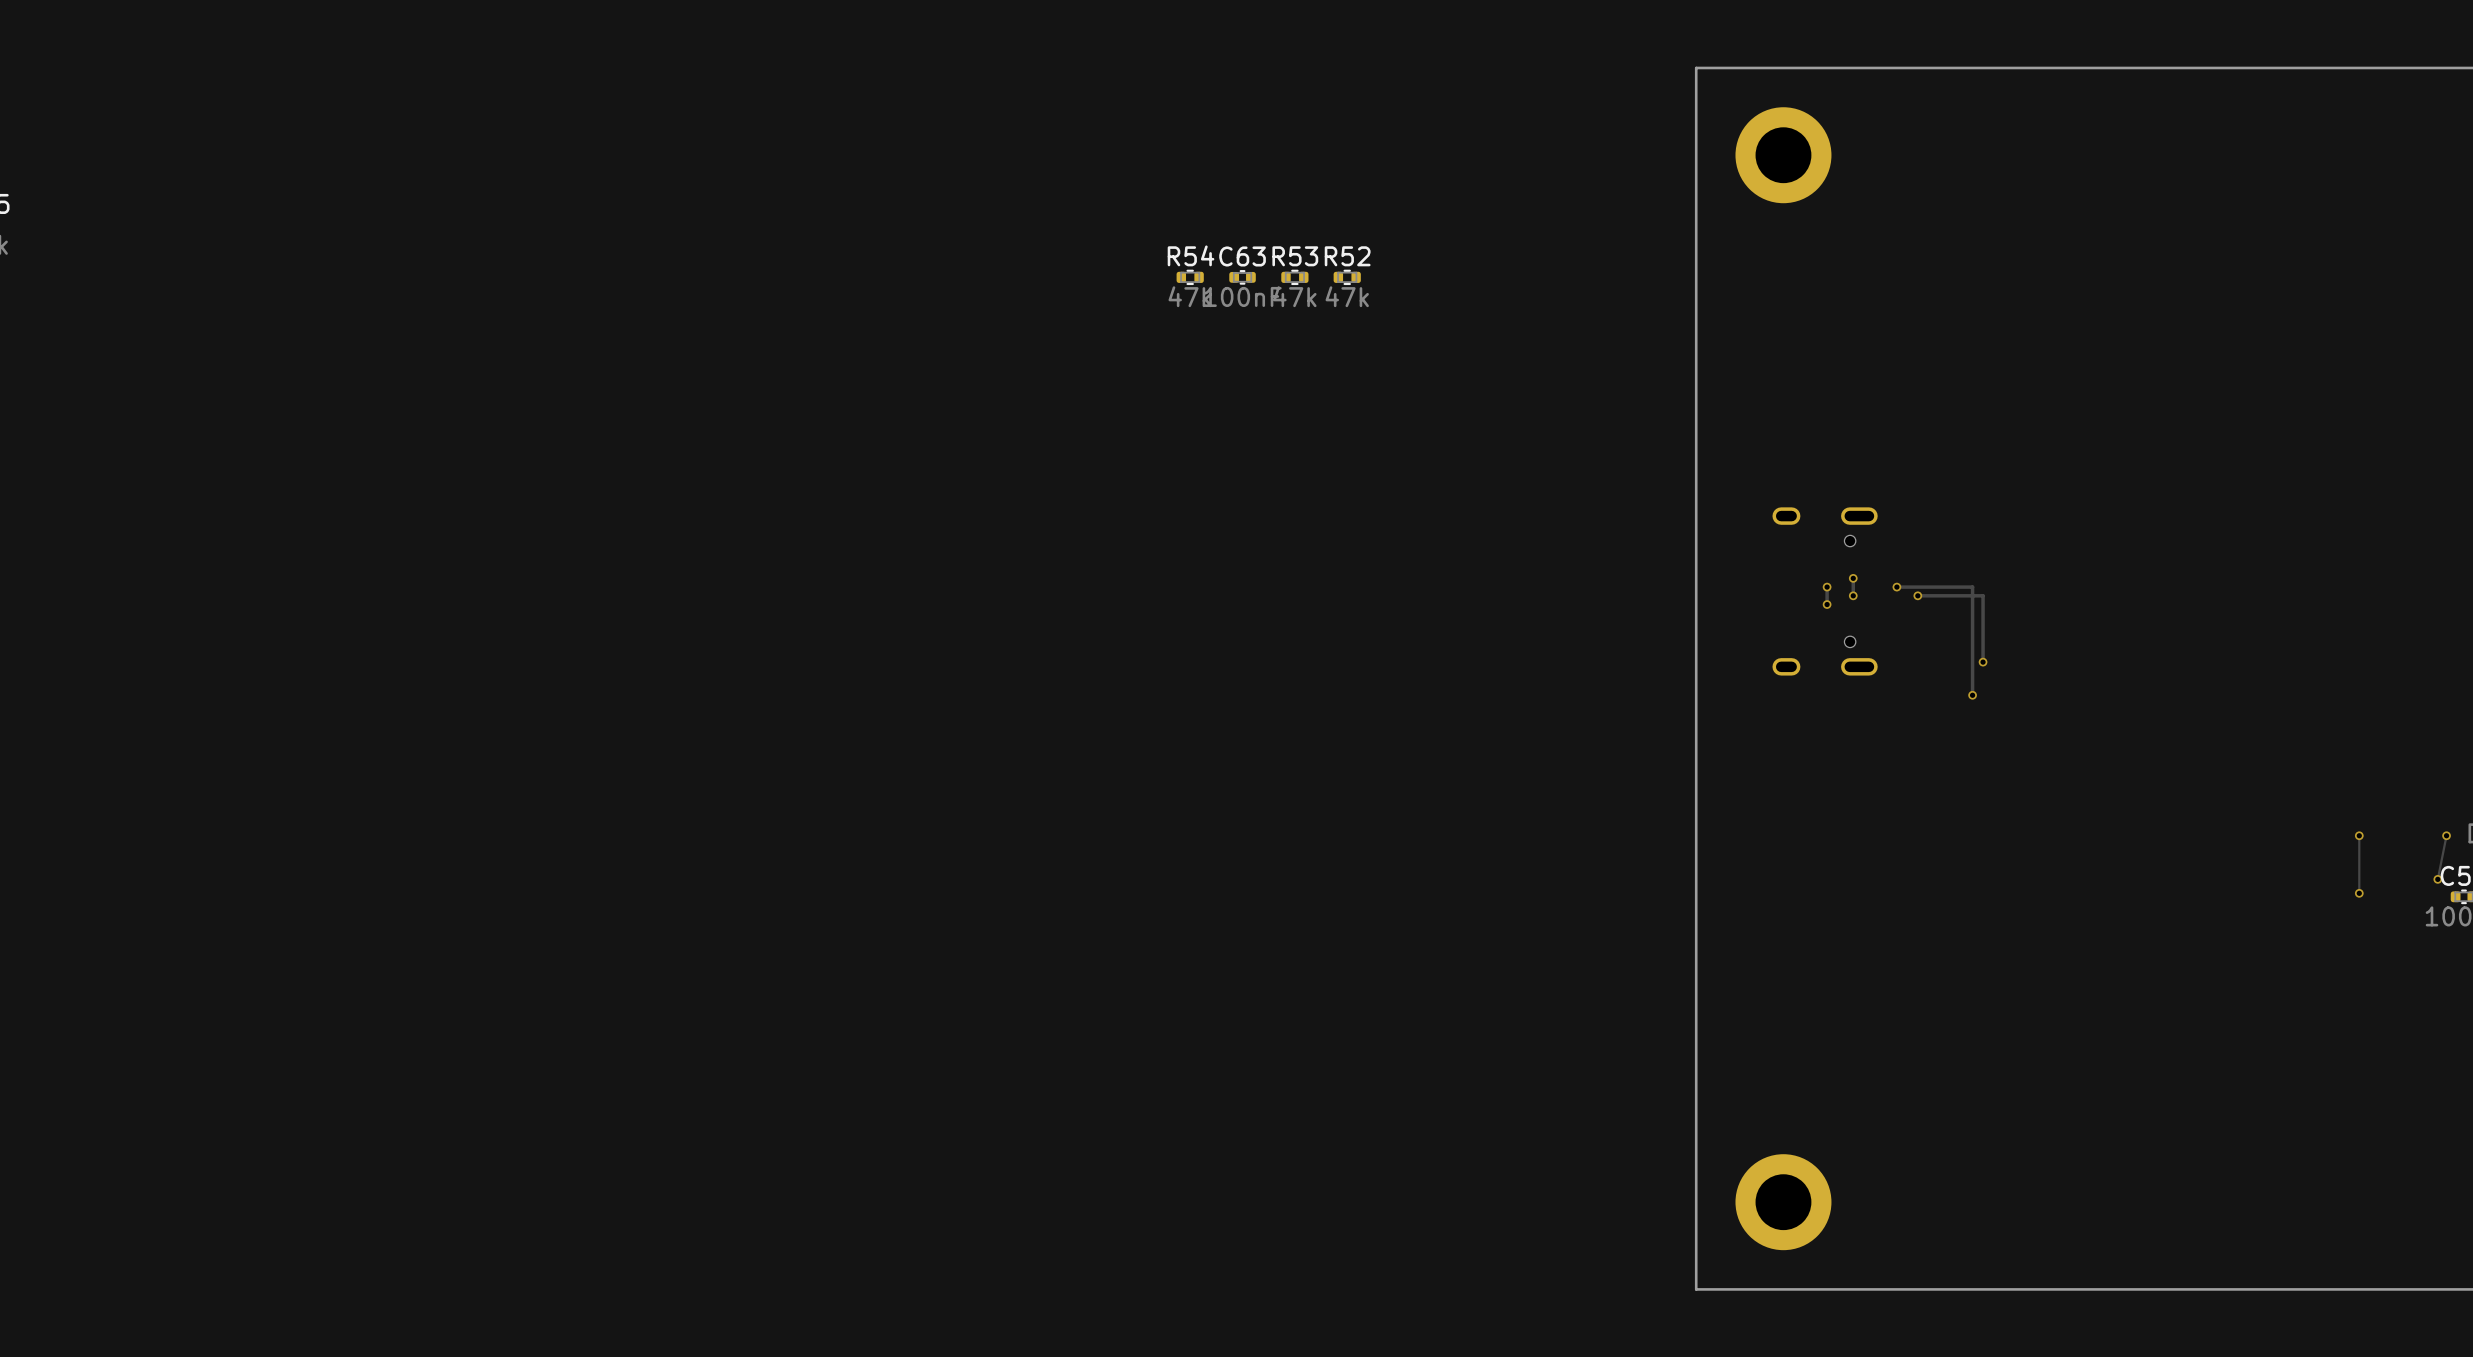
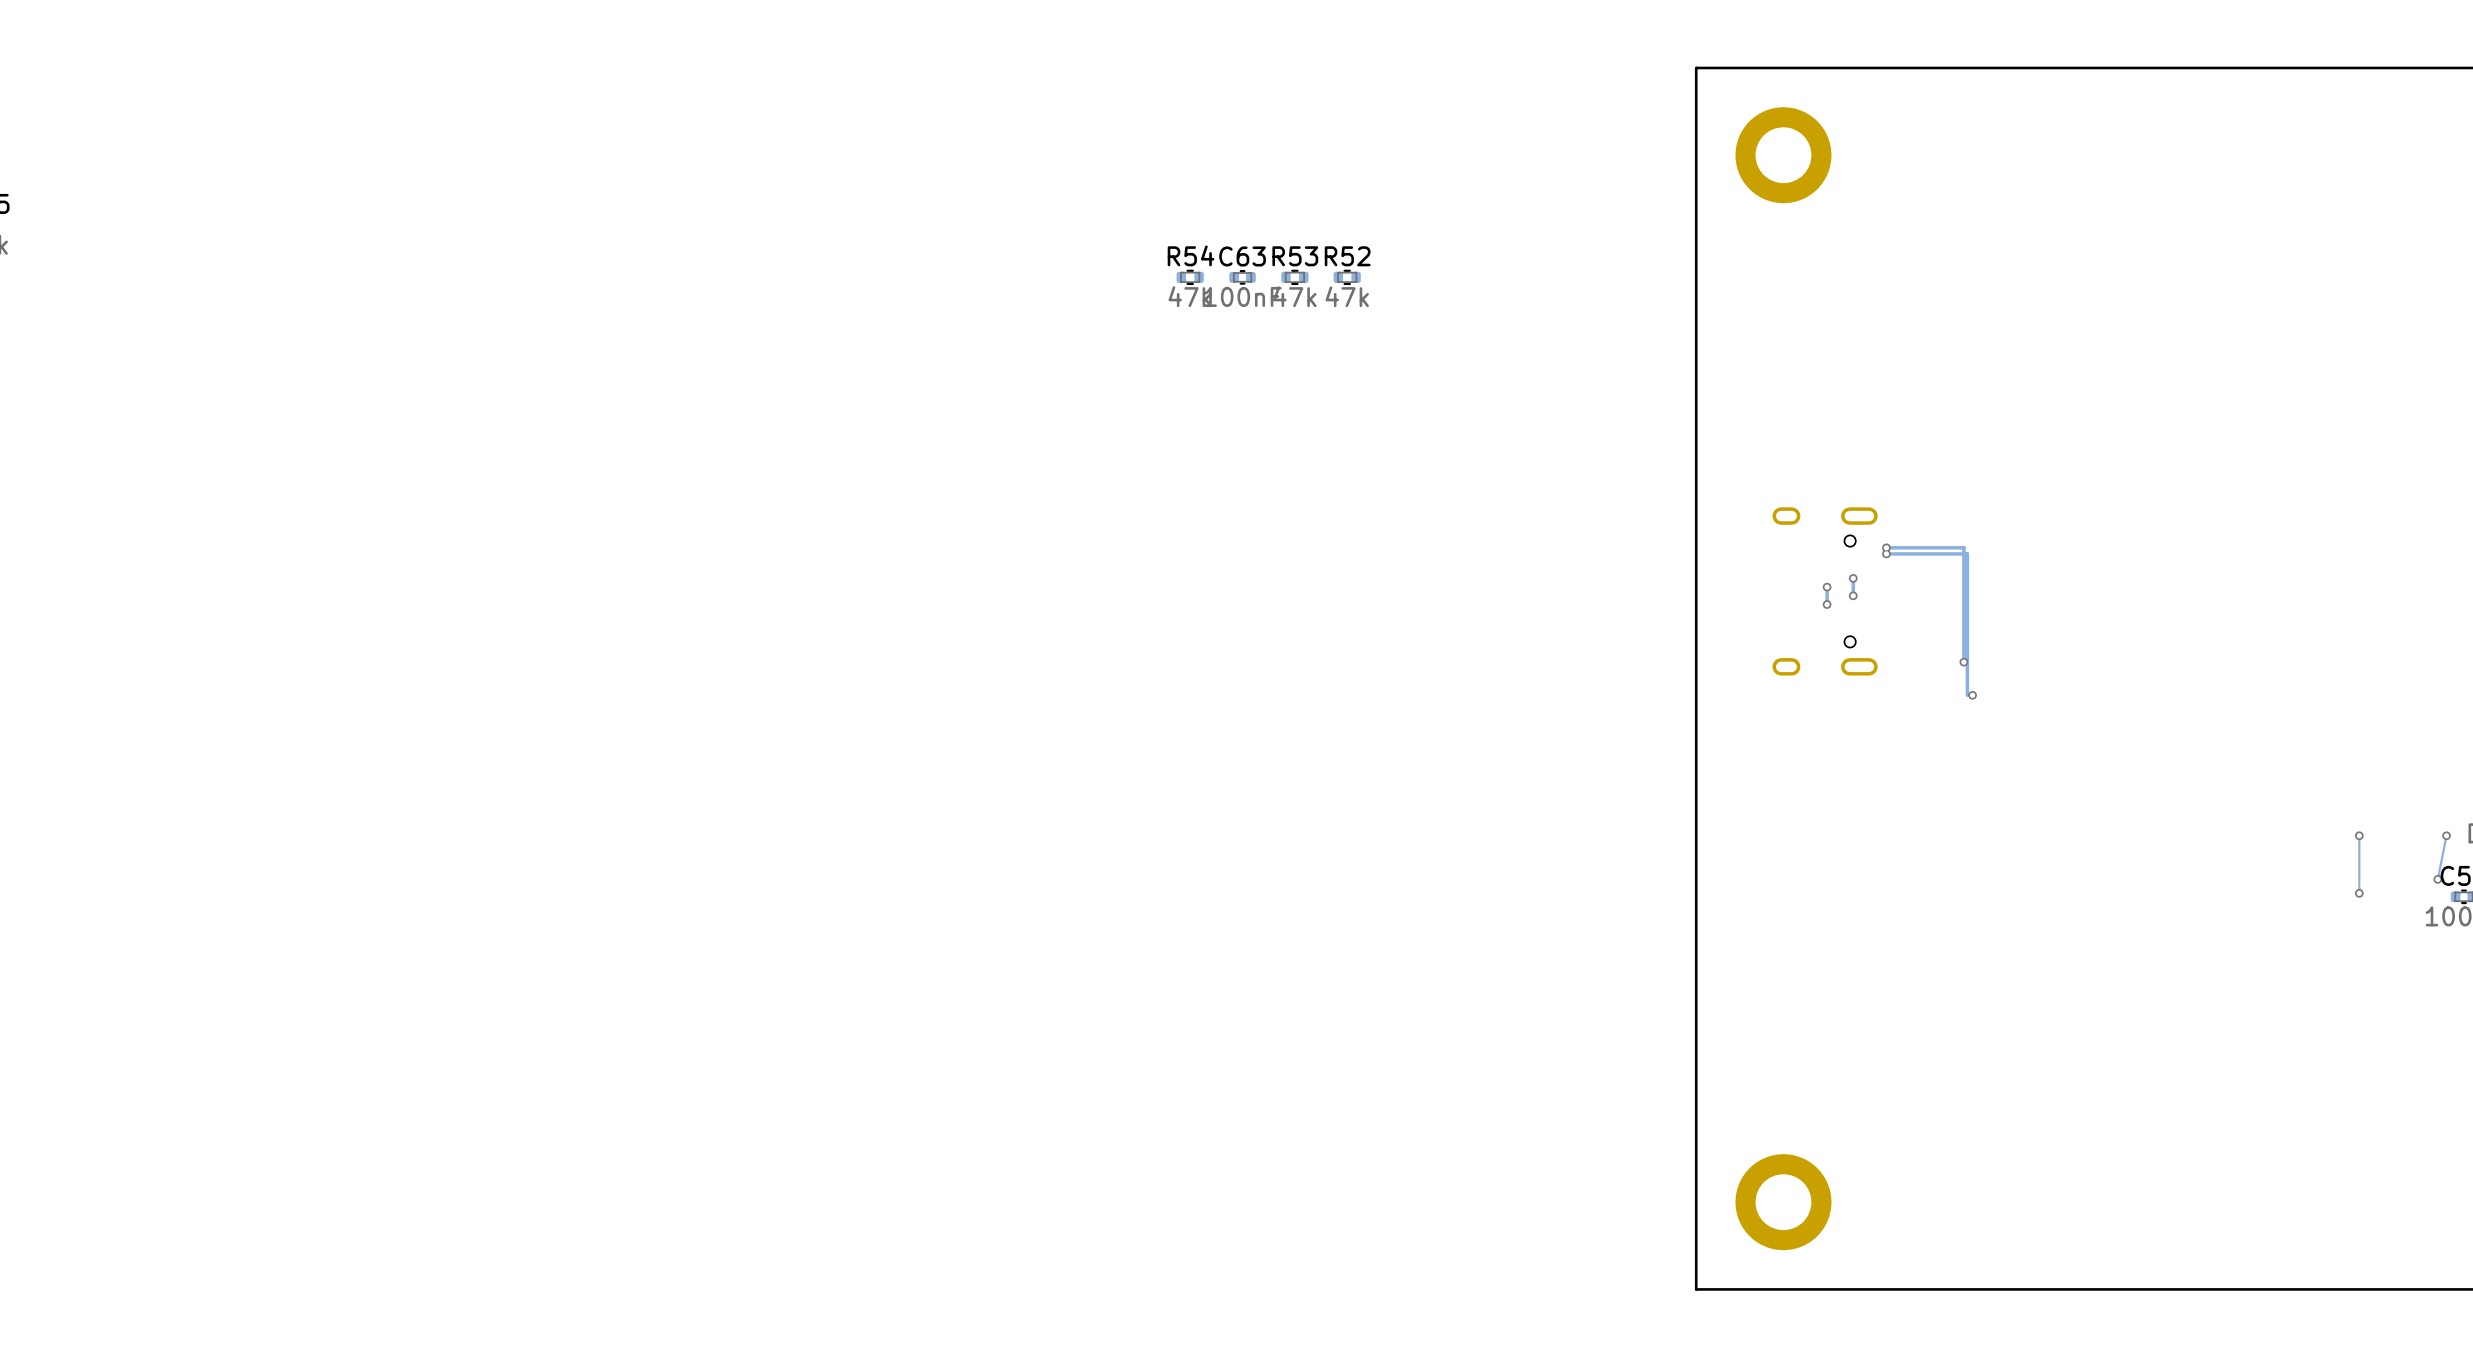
track: none -> (1886, 547) (1963, 547) (1963, 662)
via: none -> (1886, 547)
track: none -> (1886, 553) (1967, 553) (1967, 695)
via: none -> (1886, 553)
track: (1896, 587) (1972, 587) (1972, 695) -> none
via: (1896, 587) -> none
track: (1917, 595) (1983, 595) (1983, 662) -> none
via: (1917, 595) -> none
via position: (1983, 662) -> (1963, 662)

